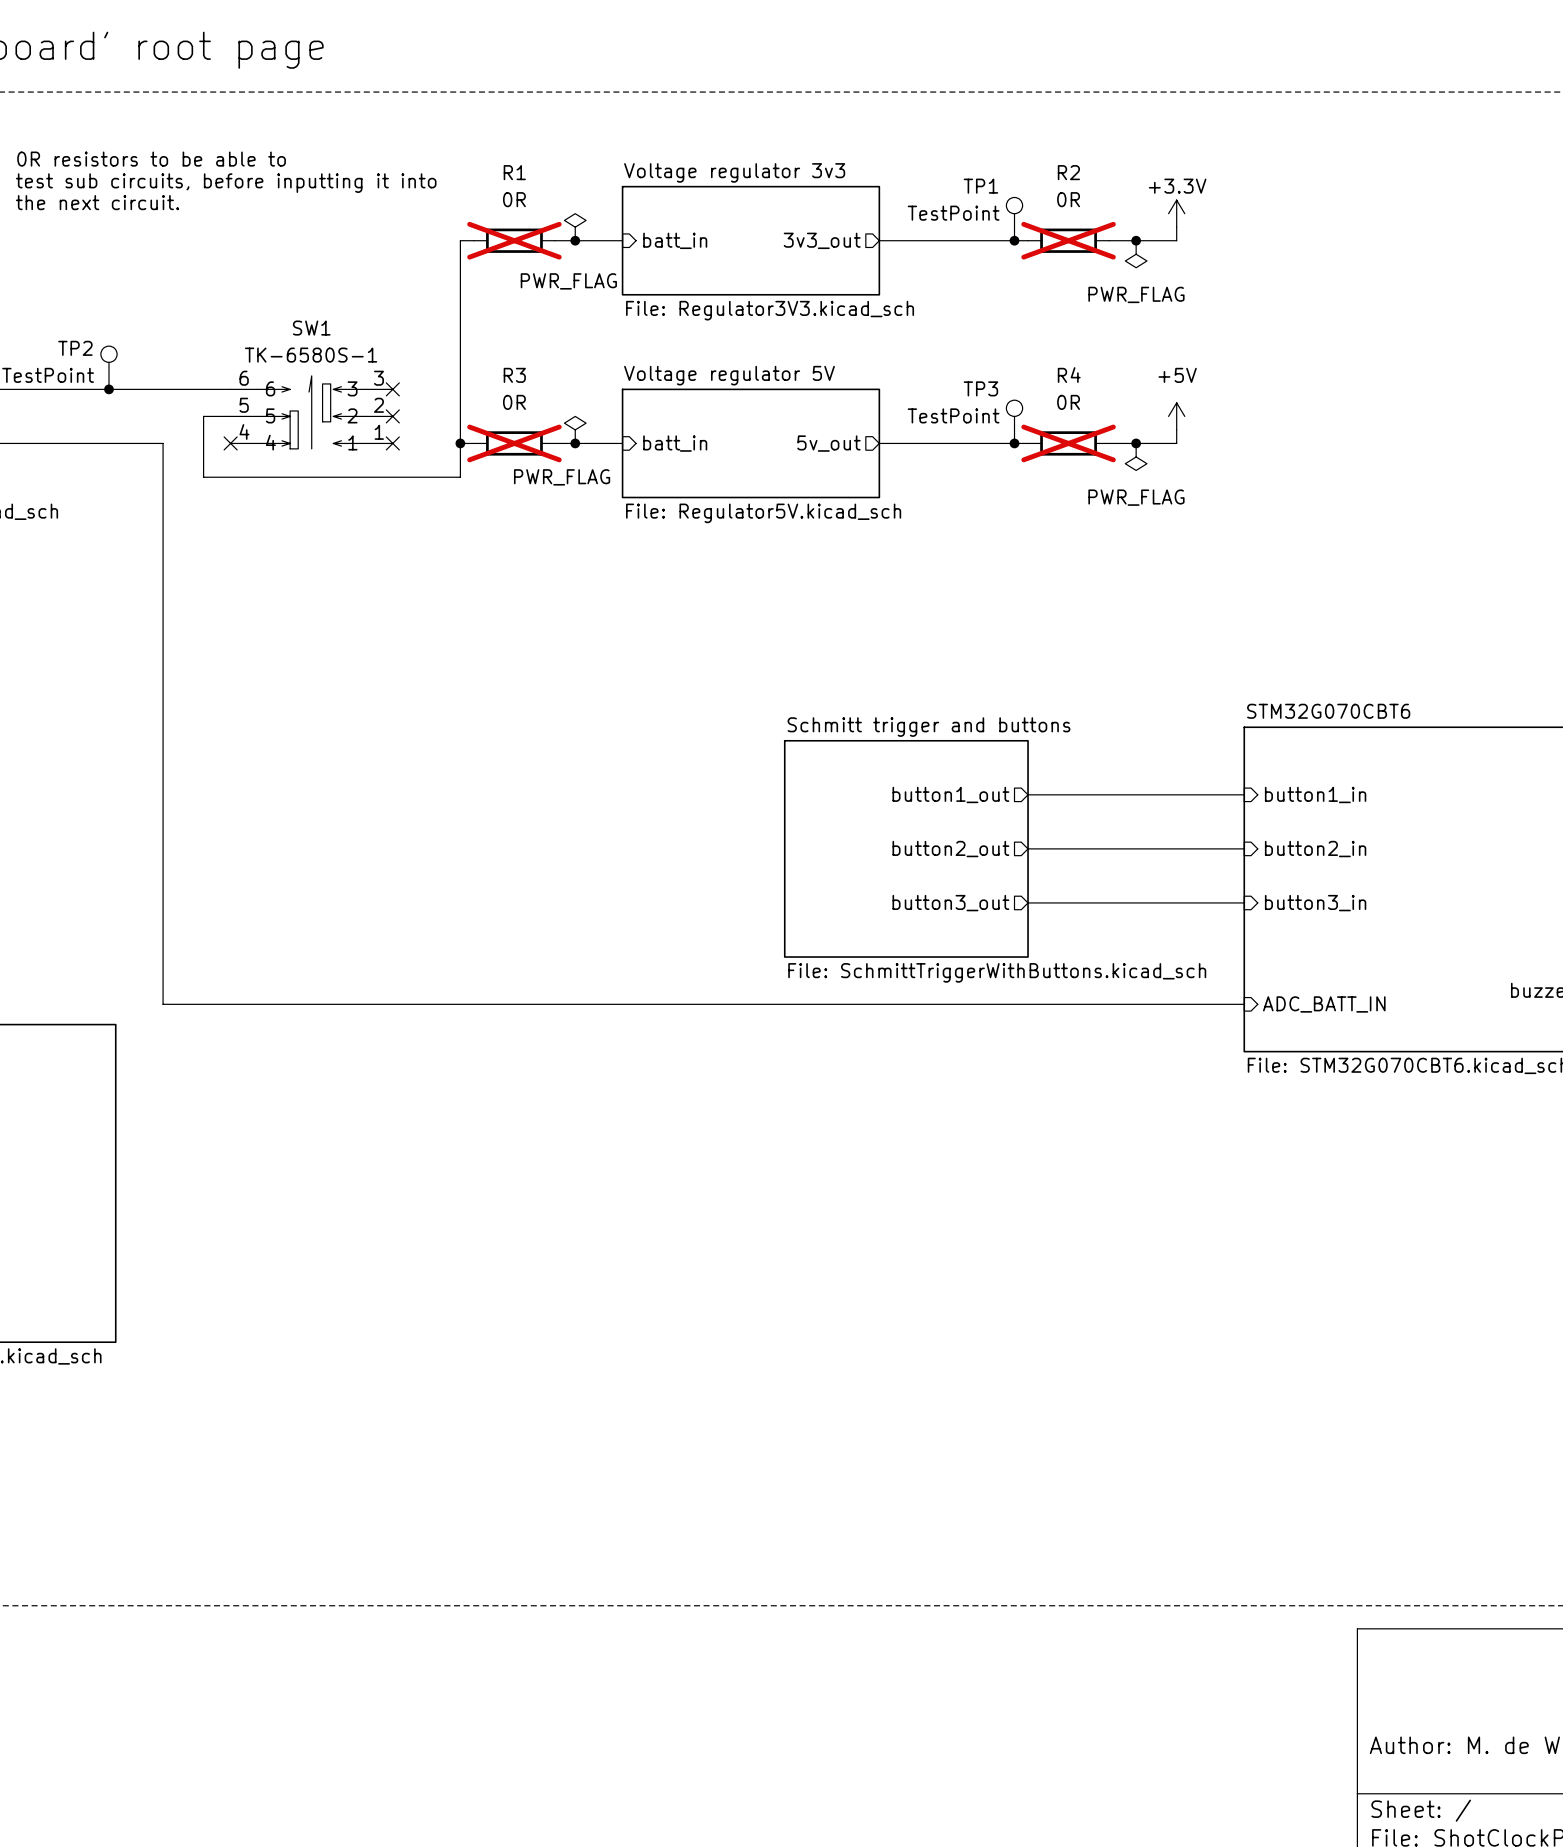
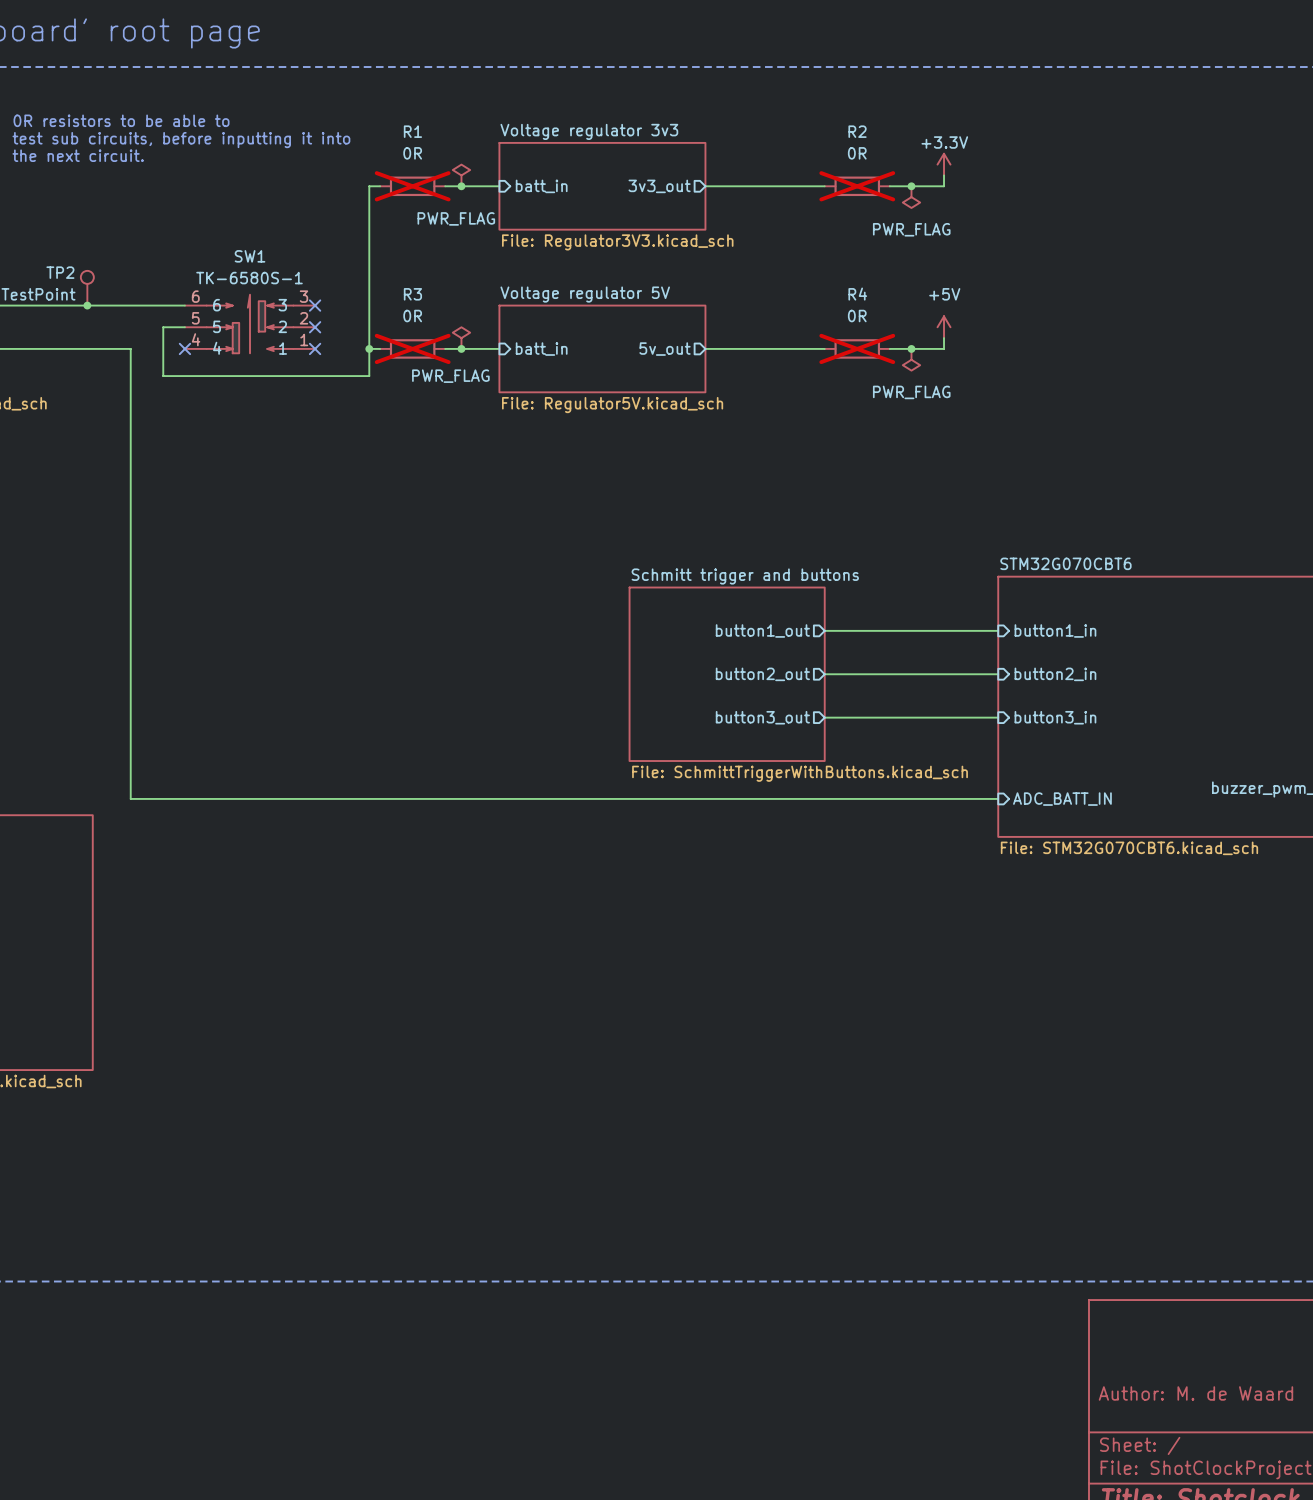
TP1: TestPoint (1014, 219) -> none
junction: (1014, 240) -> none
TP3: TestPoint (1014, 421) -> none
junction: (1014, 443) -> none

